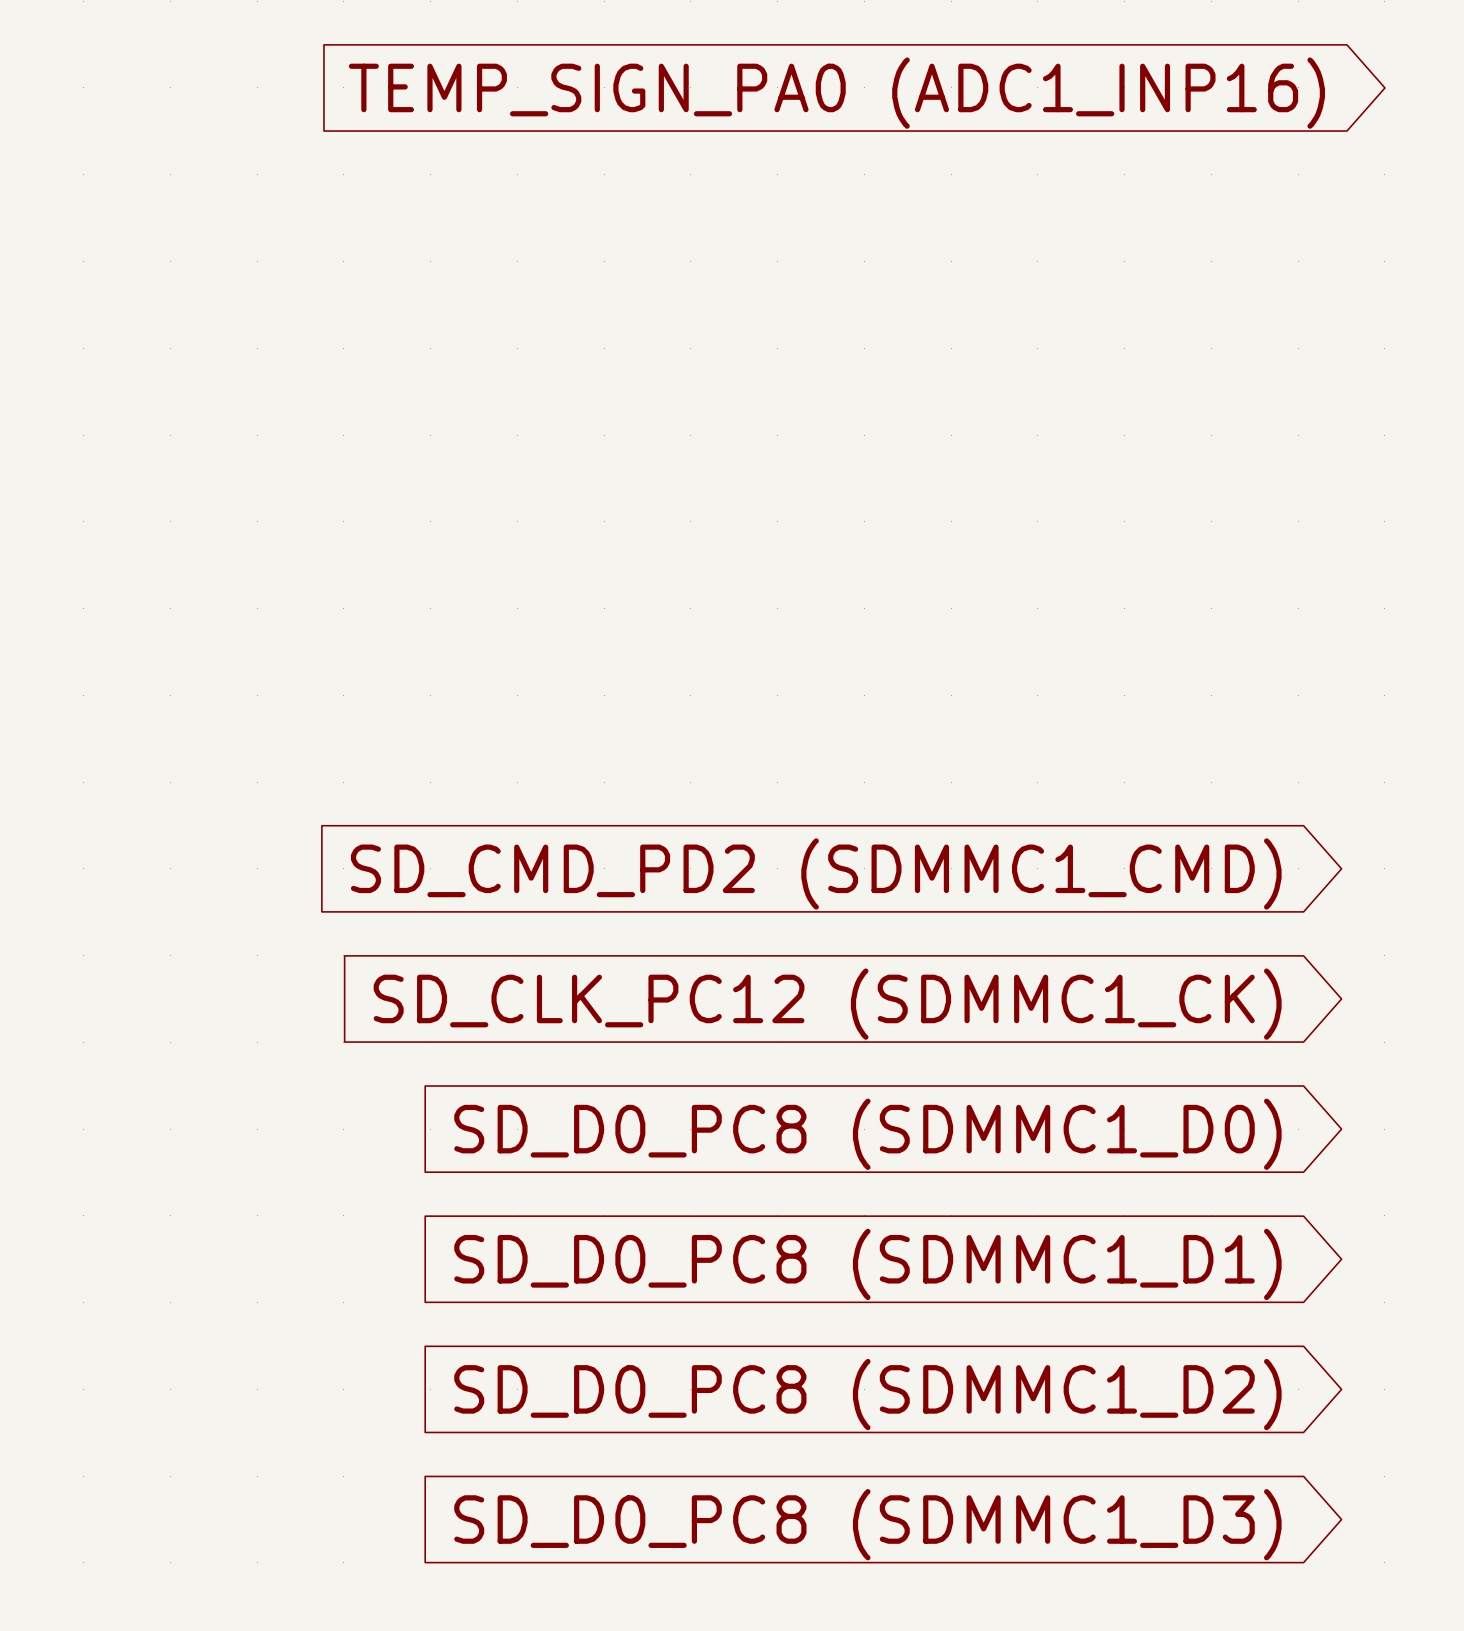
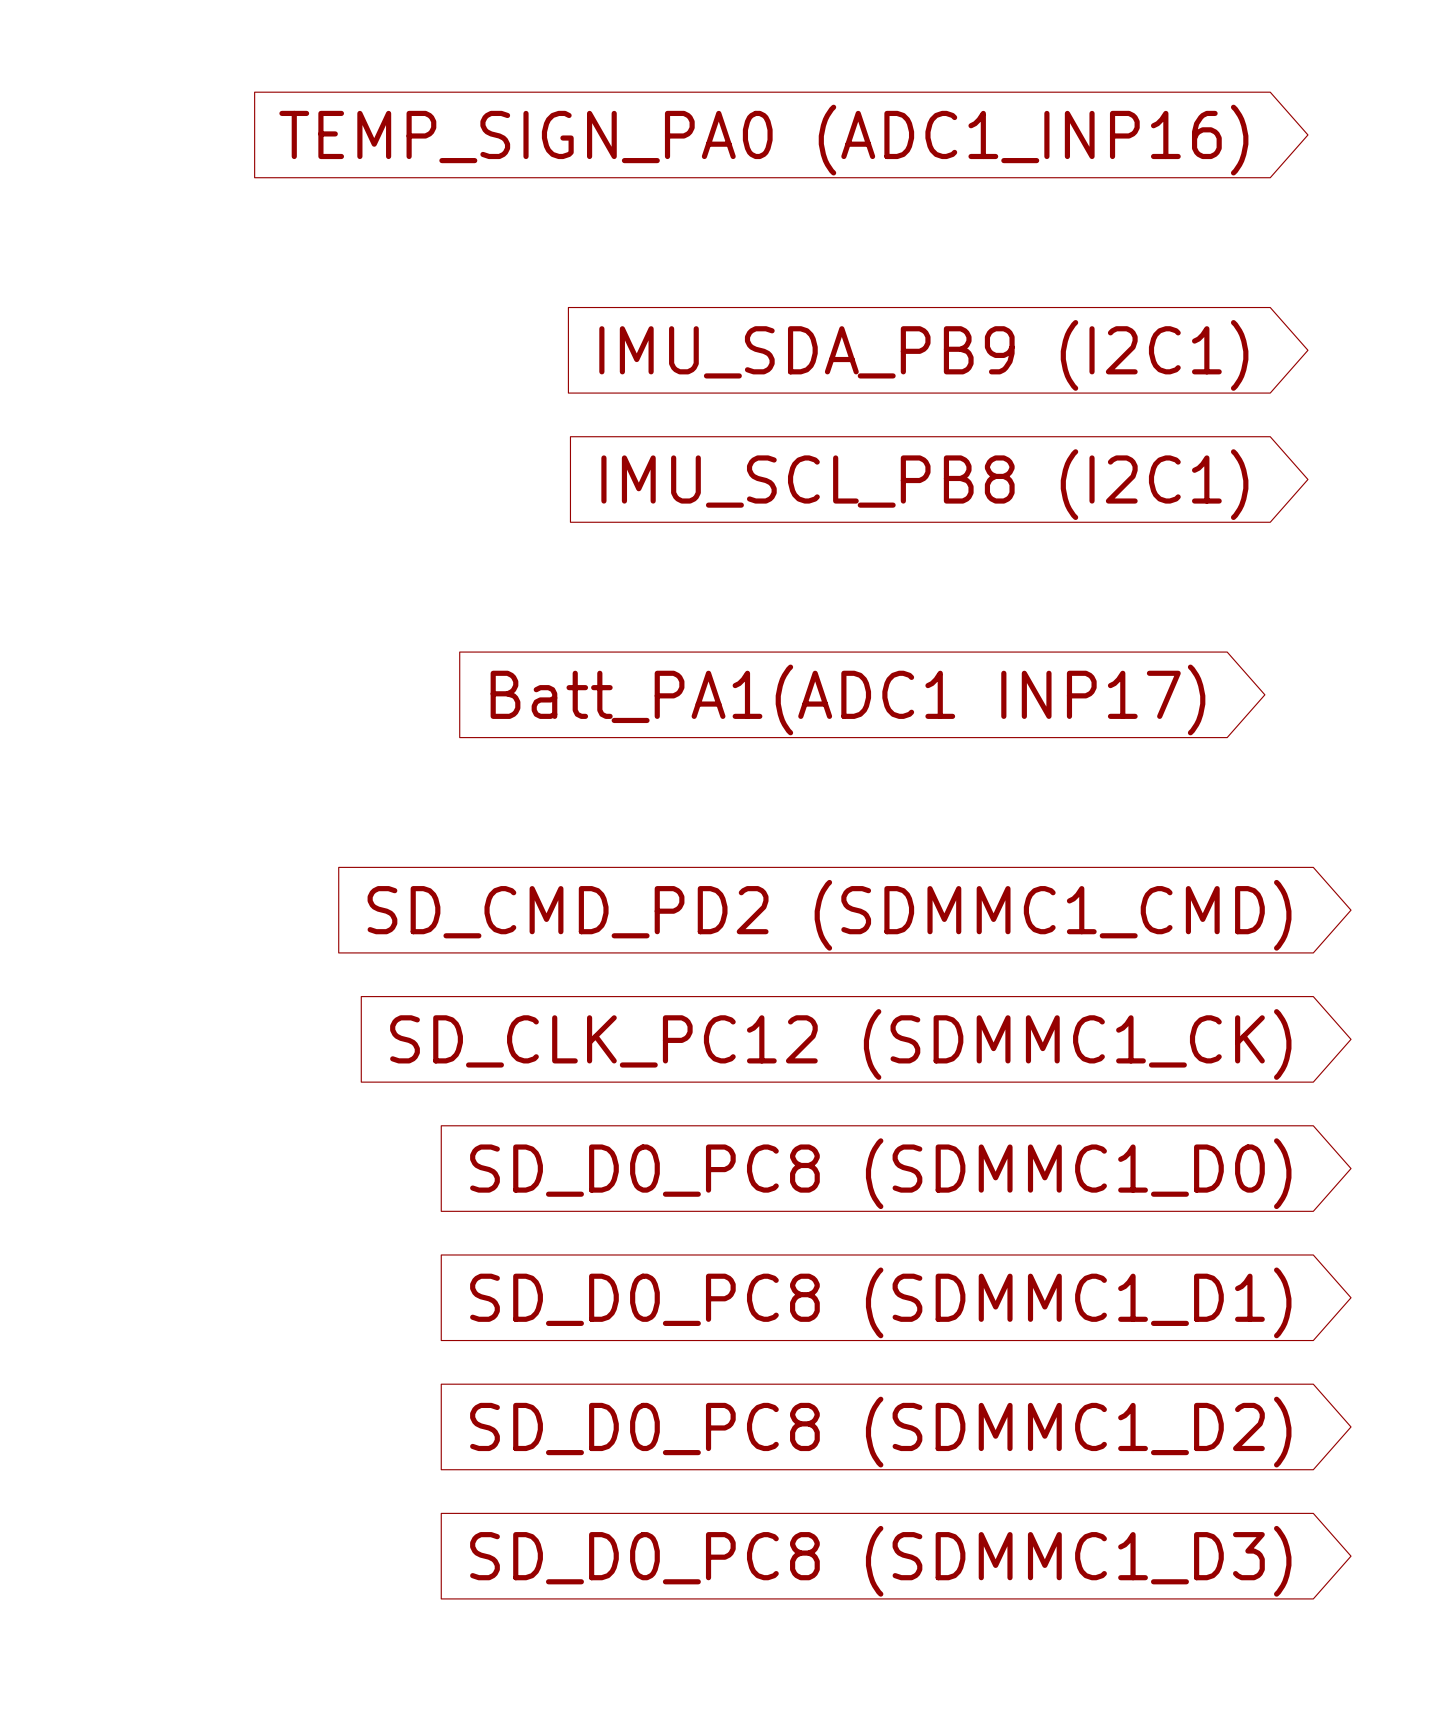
global label position: TEMP_SIGN_PA0 (ADC1_INP16) (836, 93) -> TEMP_SIGN_PA0 (ADC1_INP16) (763, 140)
global label: none -> IMU_SDA_PB9 (I2C1) (923, 355)
global label: none -> IMU_SCL_PB8 (I2C1) (924, 484)
global label: none -> Batt_PA1(ADC1 INP17) (847, 699)

